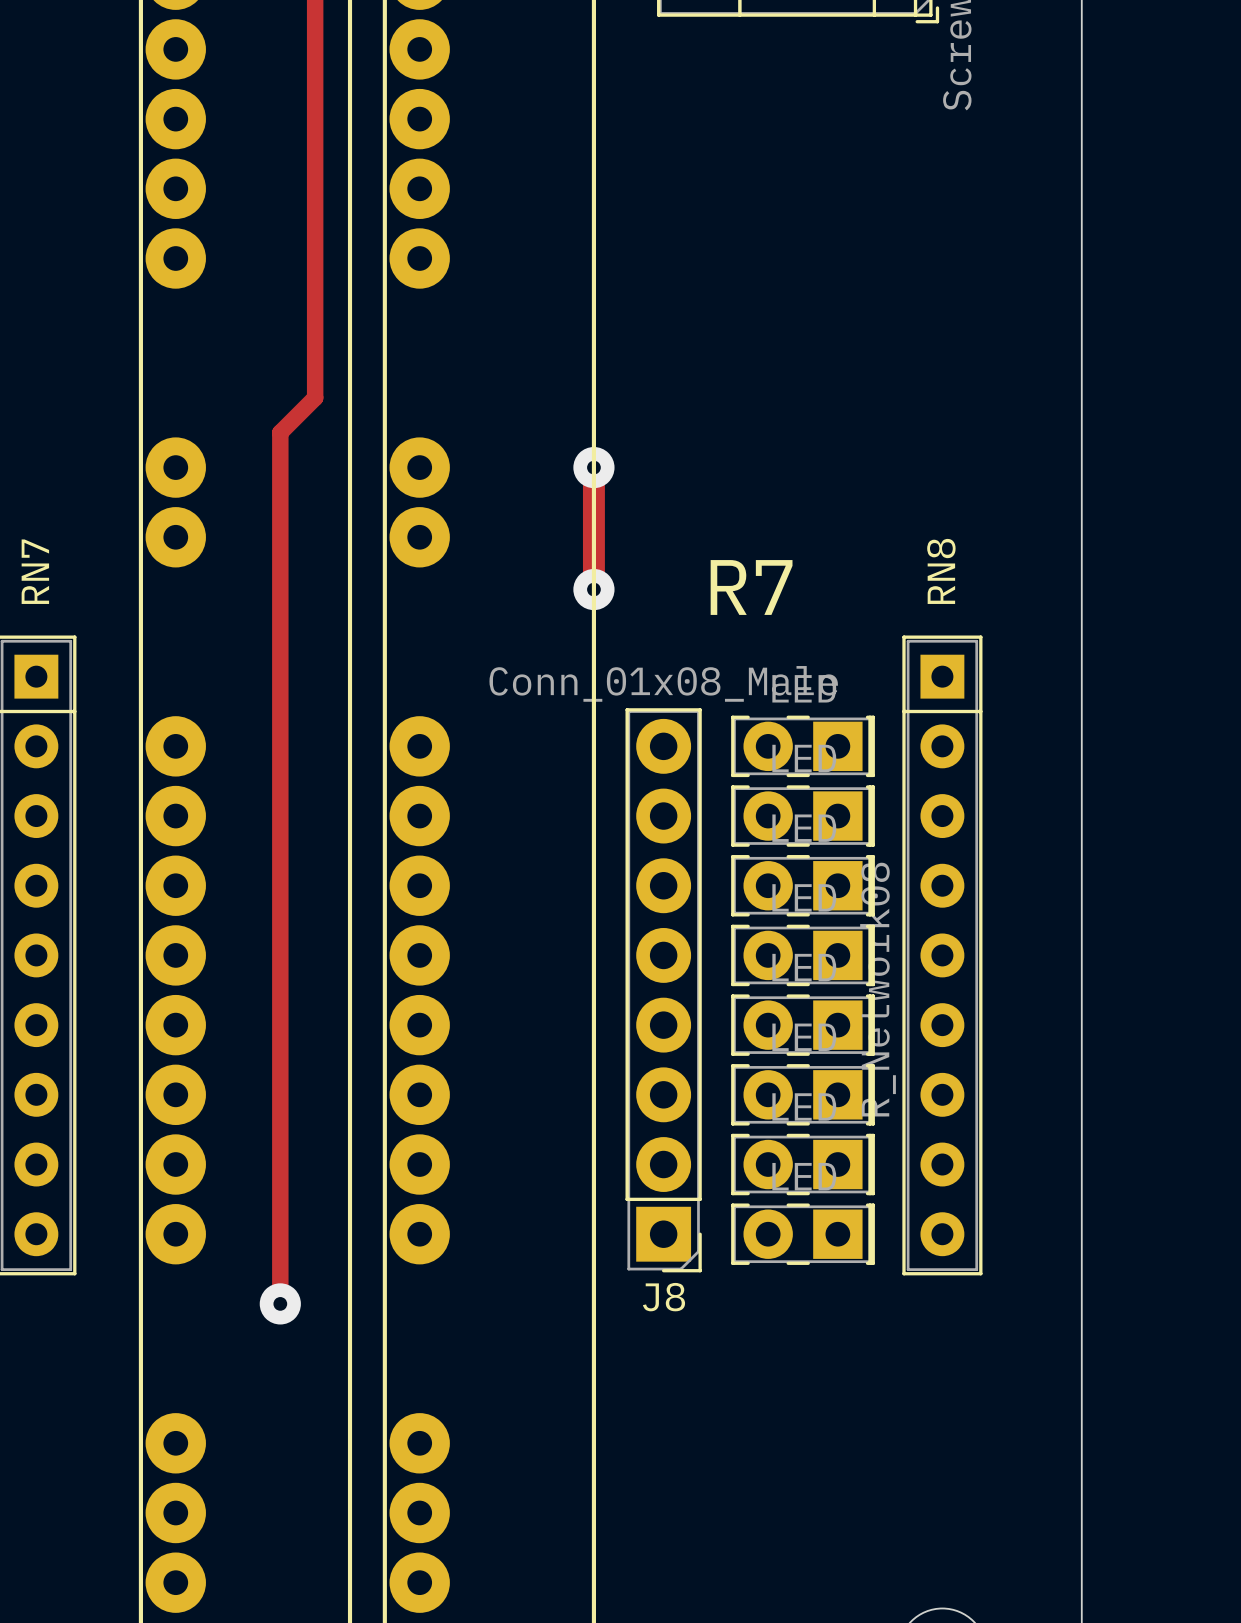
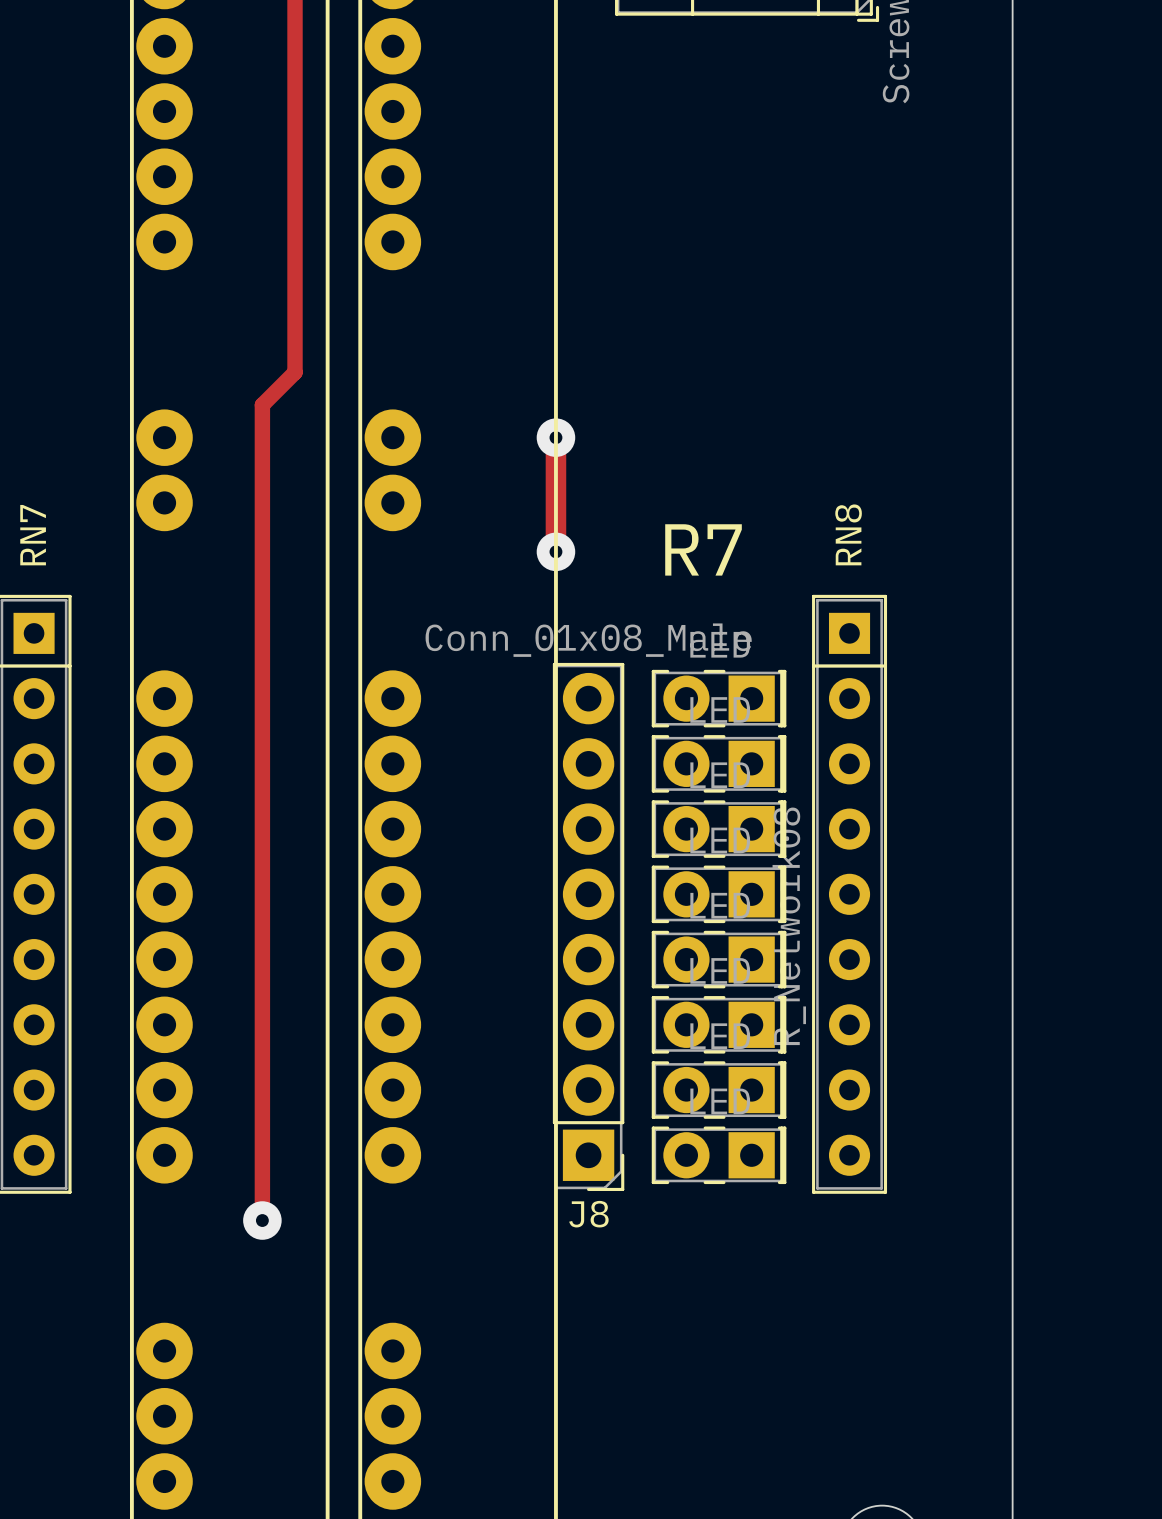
part position: (803, 746) -> (719, 698)
part position: (803, 816) -> (719, 763)
part position: (803, 885) -> (719, 829)
part position: (803, 955) -> (719, 894)
RN8 position: (942, 955) -> (849, 894)
J8 position: (663, 990) -> (588, 926)
part position: (803, 1025) -> (719, 959)
part position: (803, 1094) -> (719, 1024)
part position: (803, 1164) -> (719, 1090)
part position: (803, 1234) -> (719, 1155)

